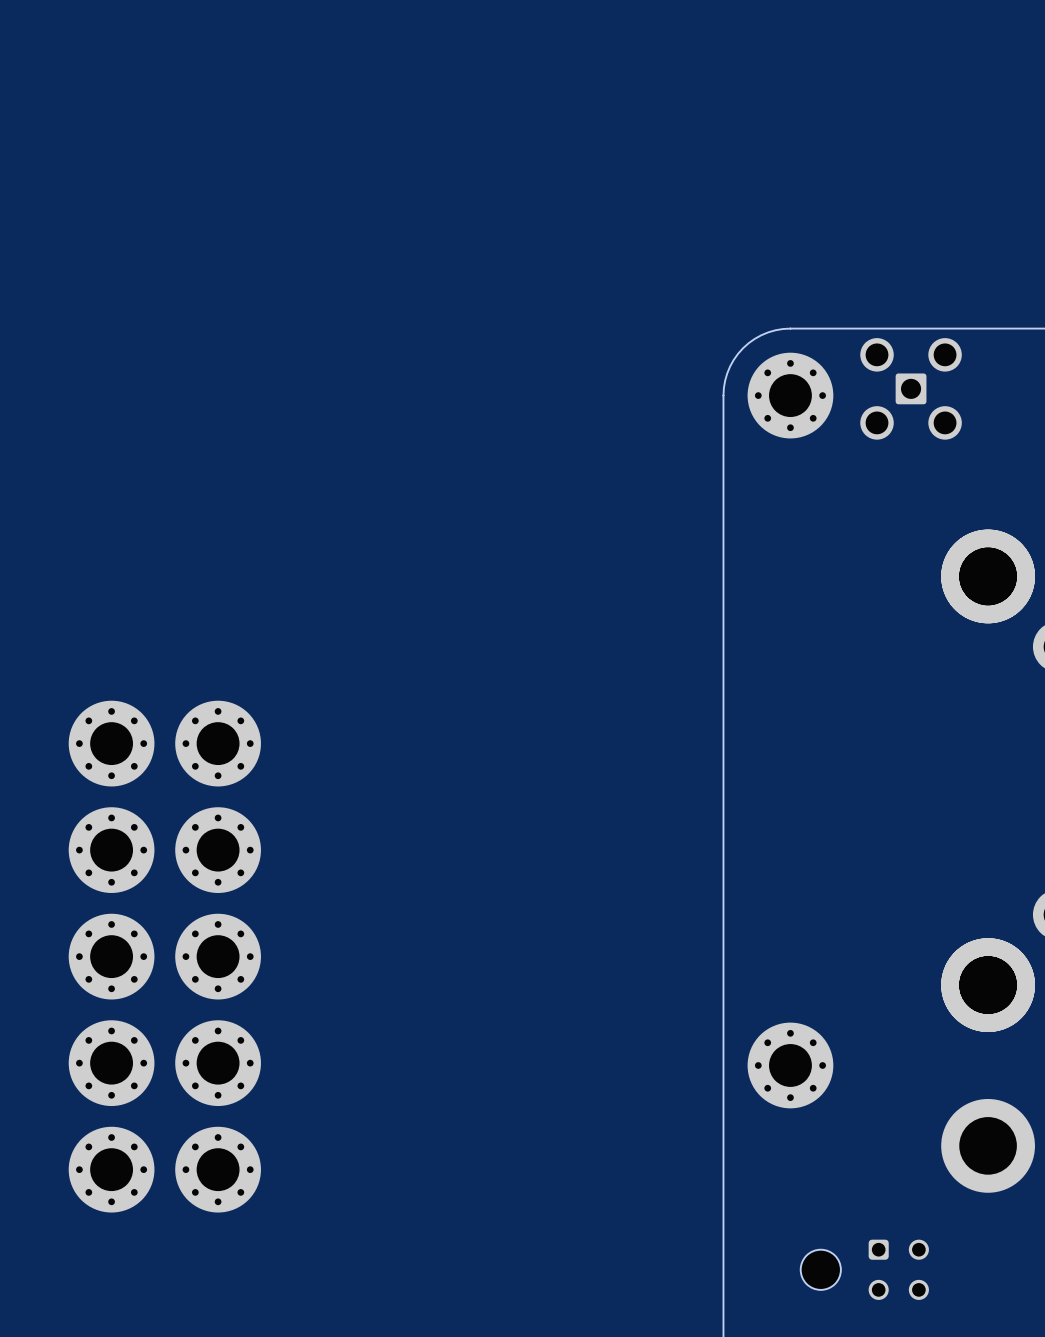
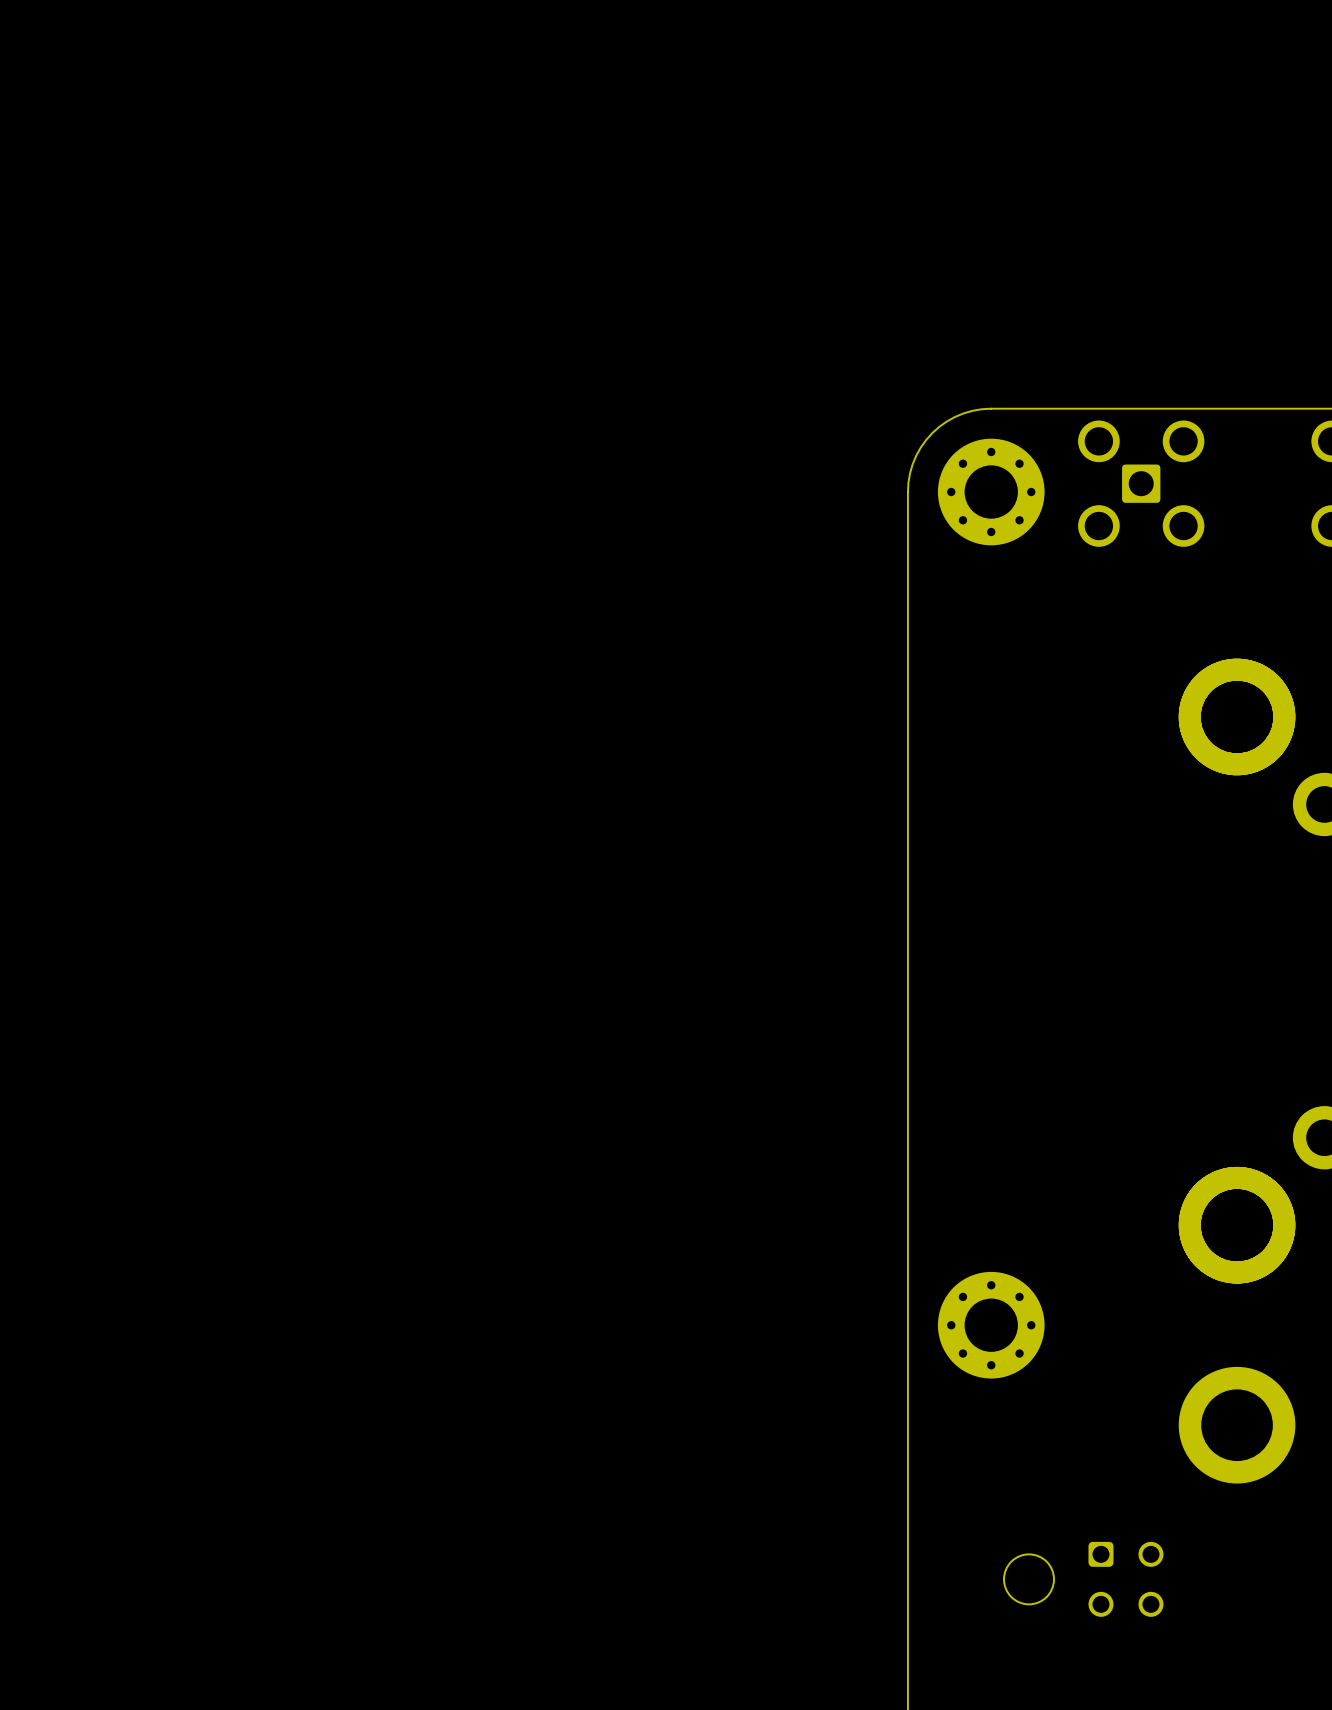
part: (111, 743) -> none
part: (218, 743) -> none
part: (111, 850) -> none
part: (218, 850) -> none
part: (111, 956) -> none
part: (218, 956) -> none
part: (111, 1063) -> none
part: (218, 1063) -> none
part: (111, 1169) -> none
part: (218, 1169) -> none

